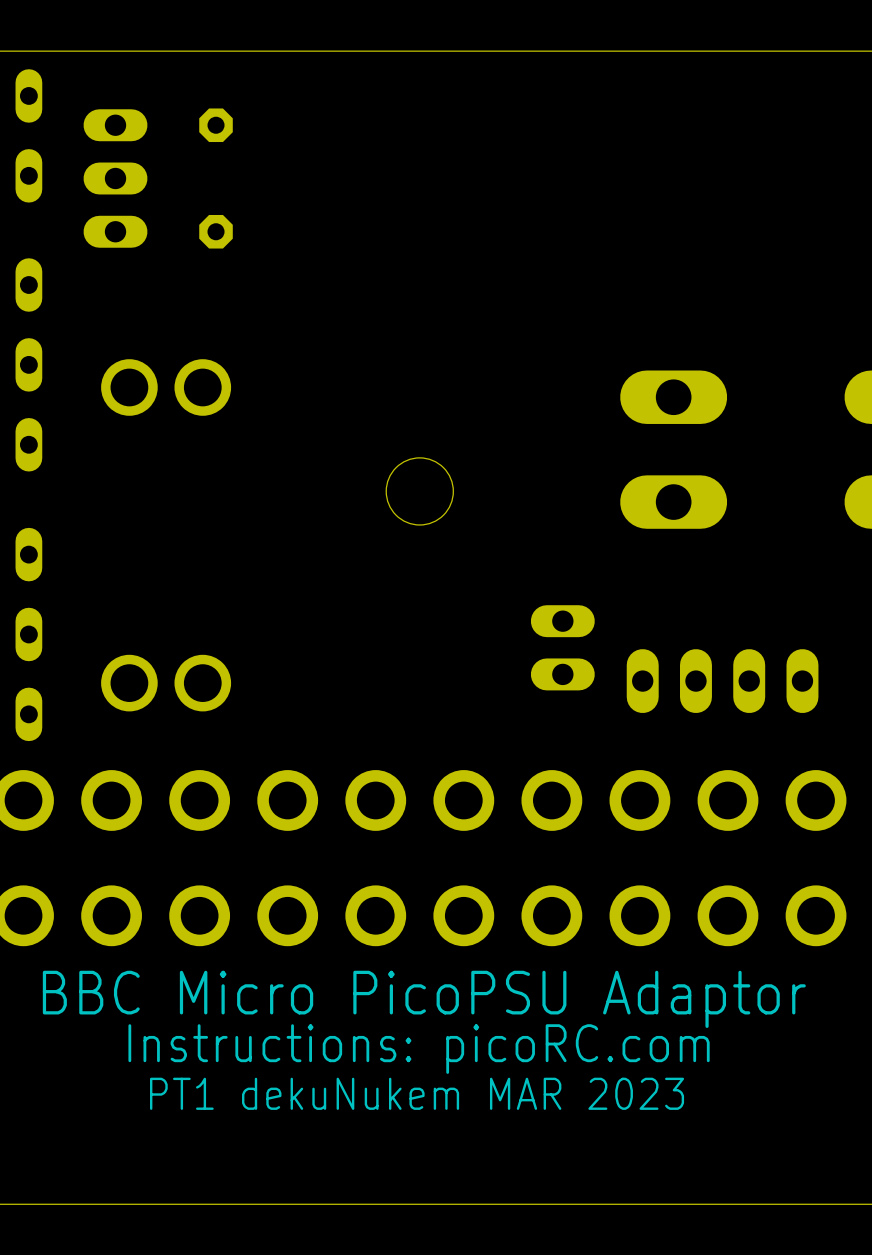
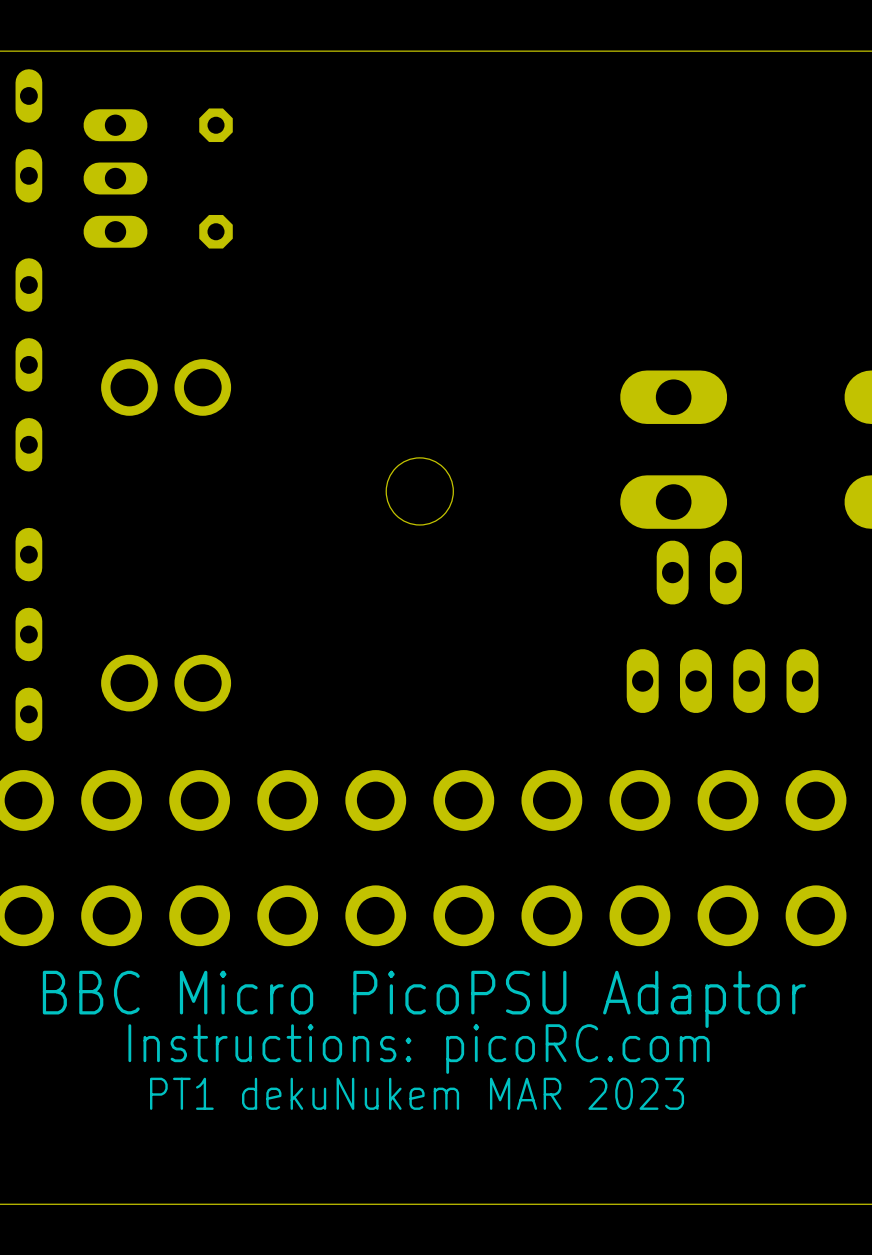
part rotation: 0° (562, 647) -> 90° clockwise (699, 572)
part position: (562, 647) -> (699, 572)

